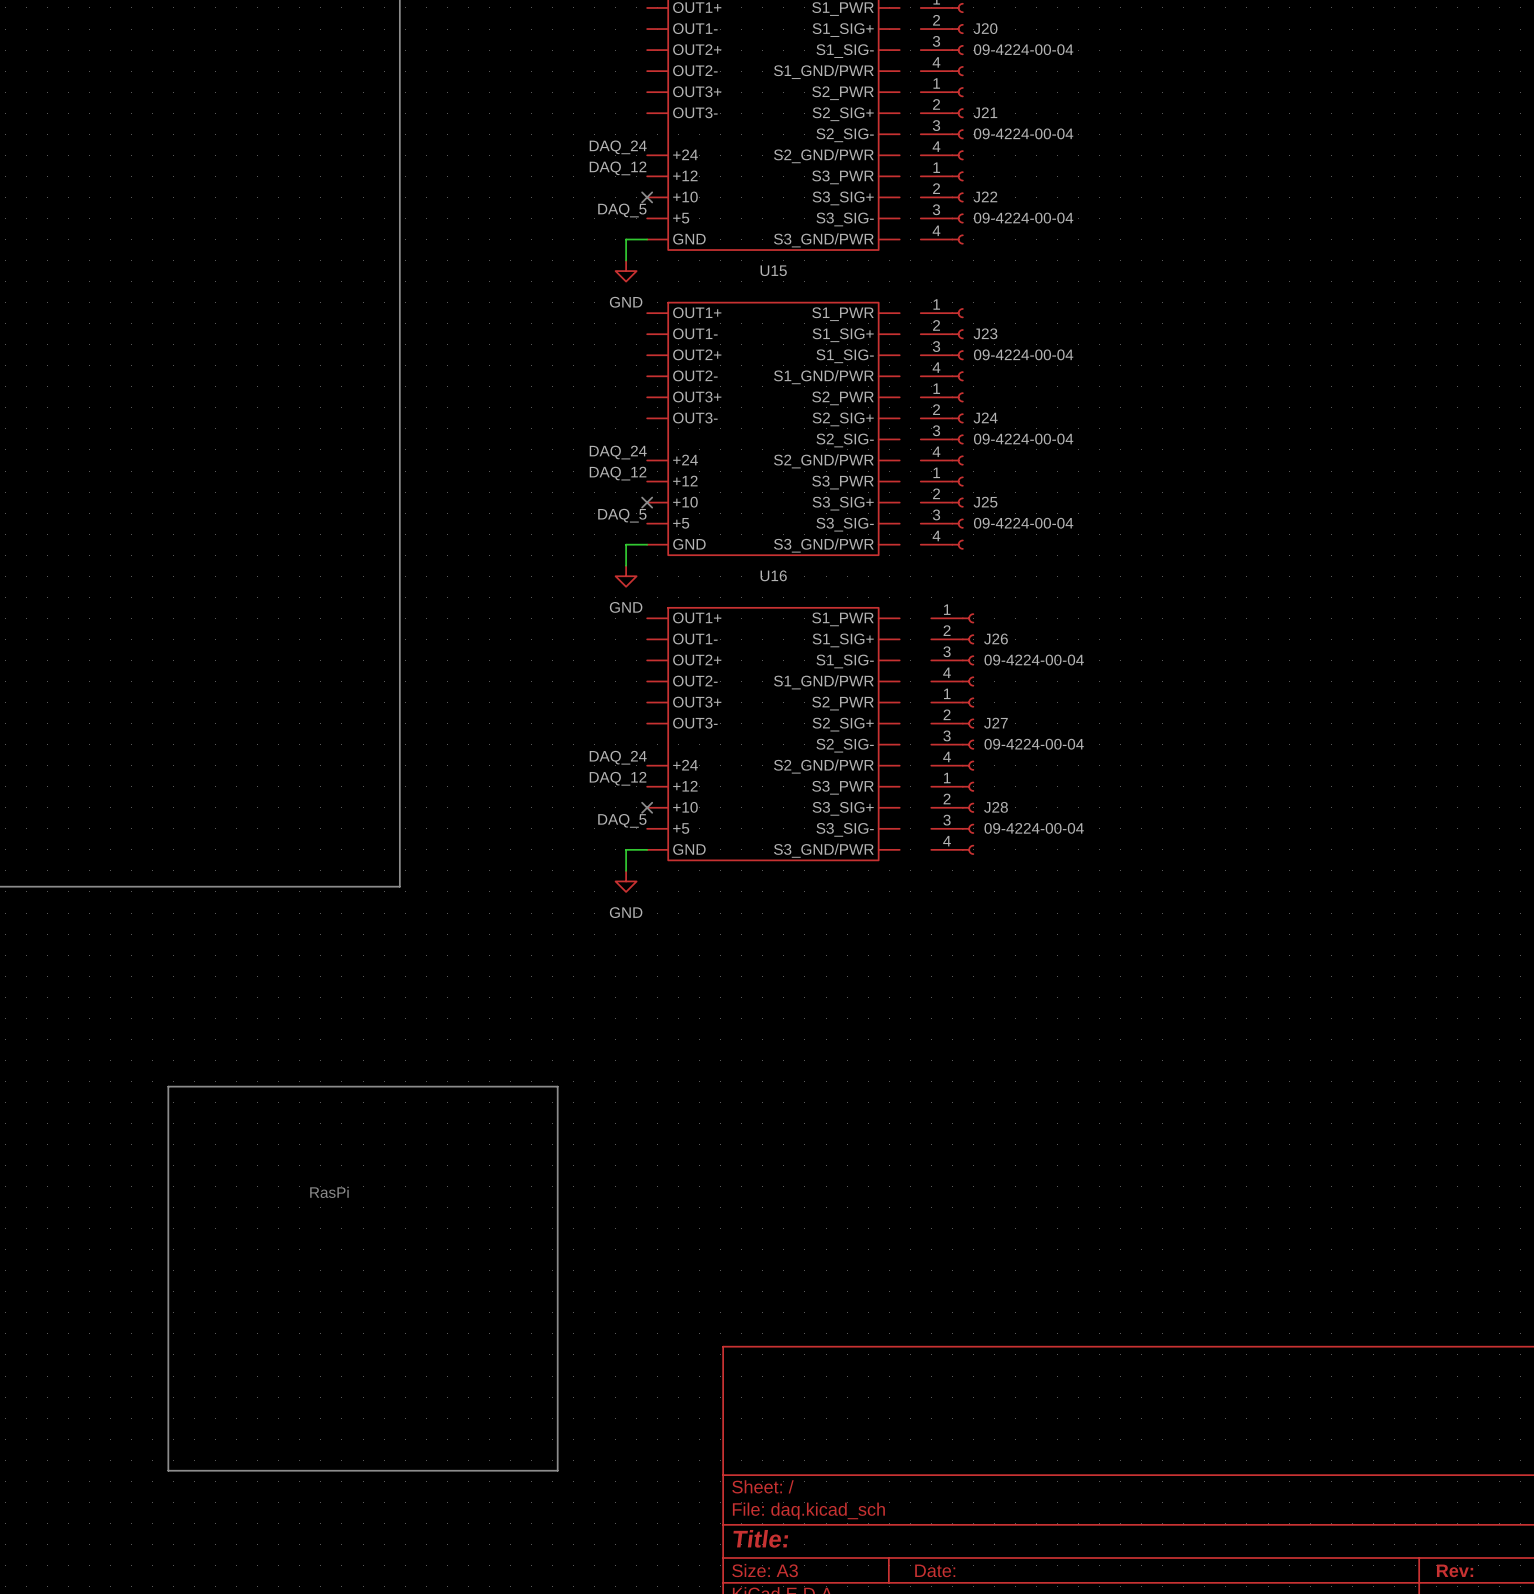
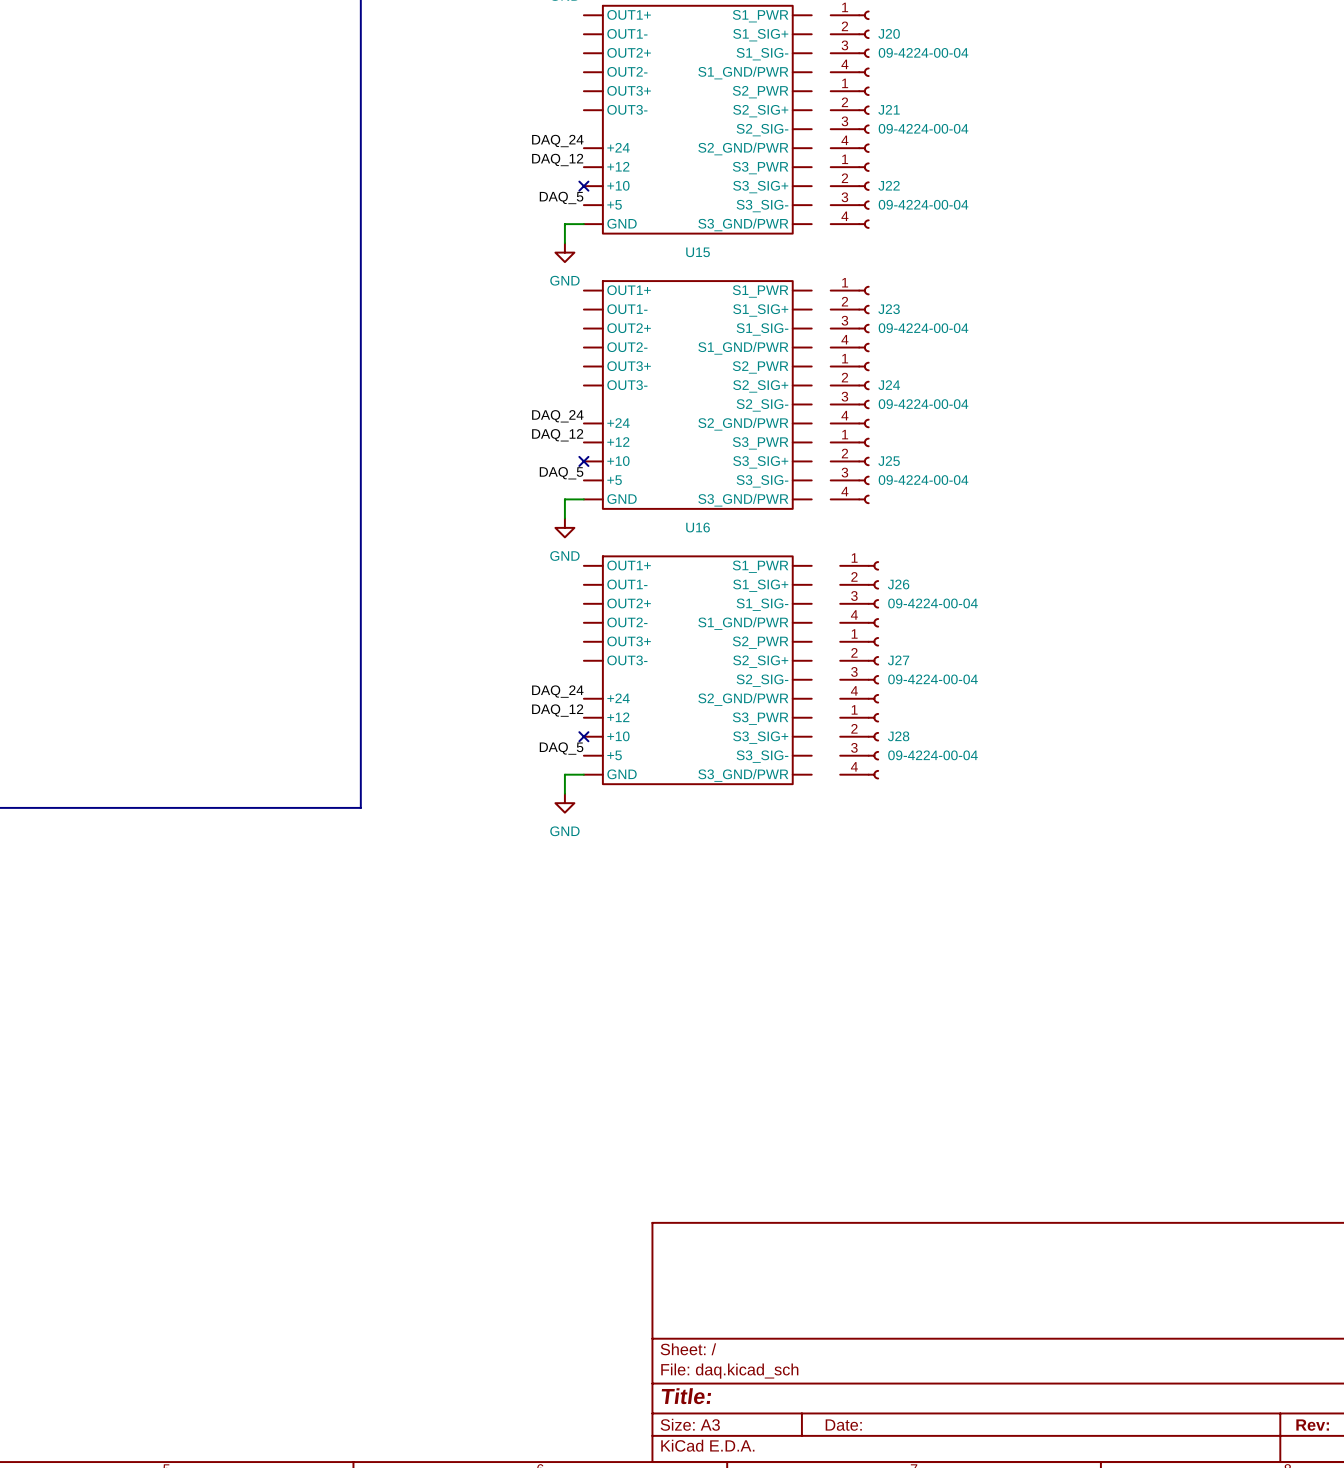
line: (168, 1086) (557, 1086) (557, 1470) (168, 1470) (168, 1086) -> none
text: RasPi (329, 1192) -> none

